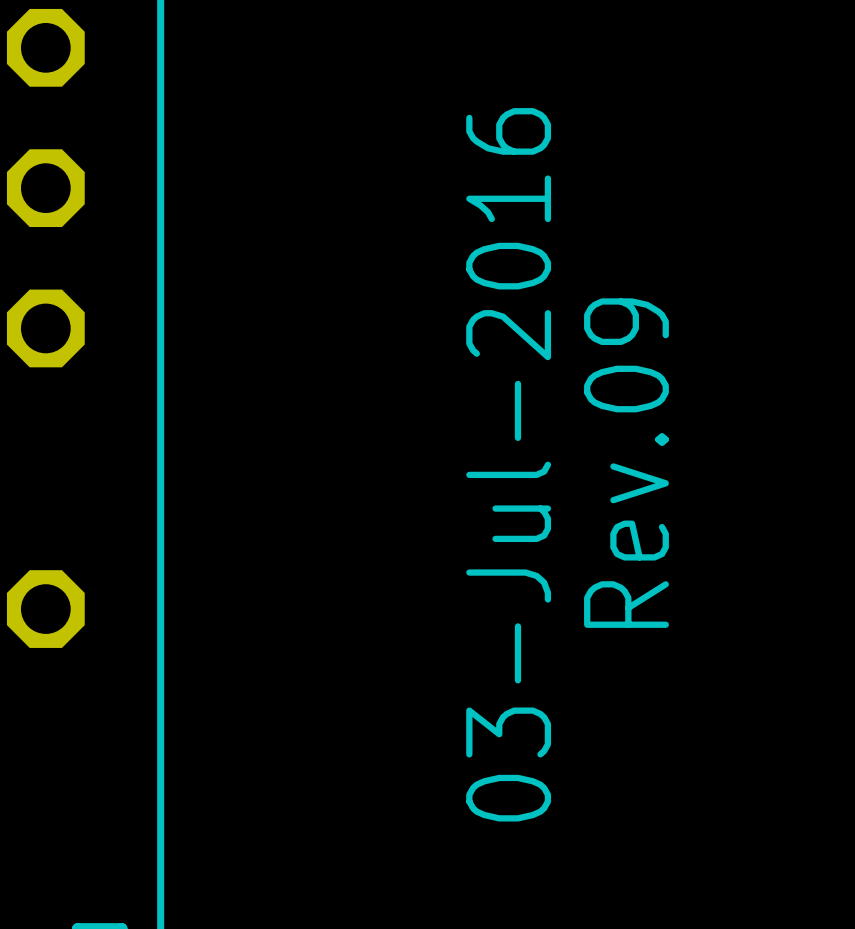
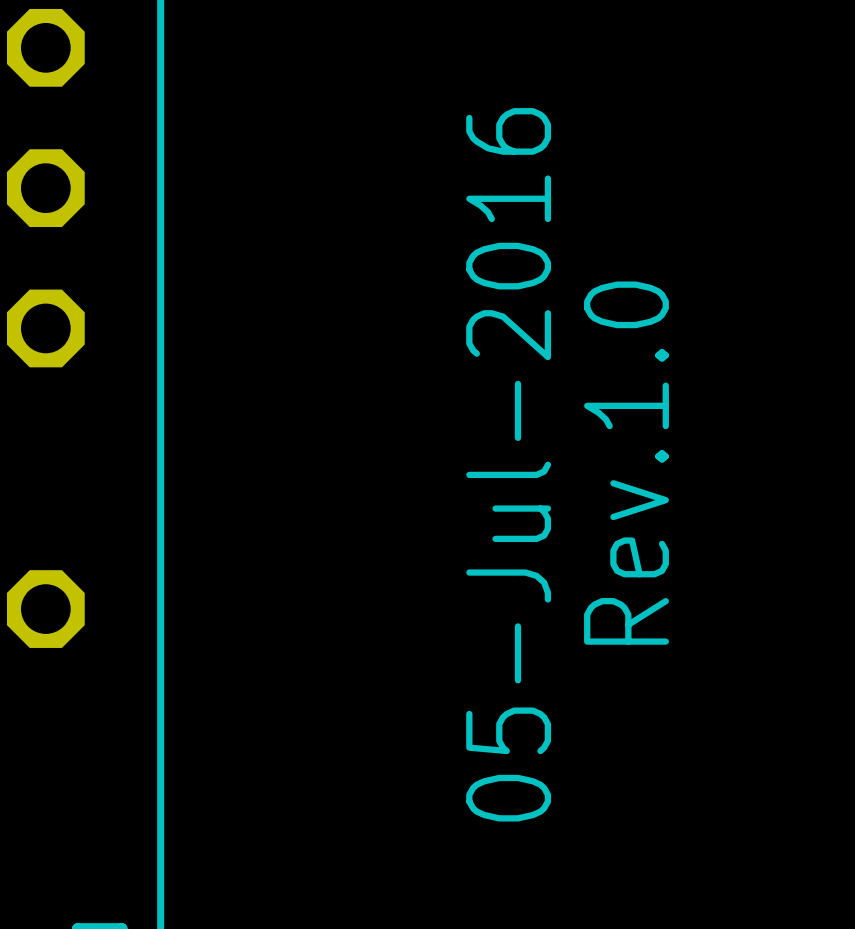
text: Rev.09 (626, 463) -> Rev.1.0 (626, 463)
text: 03-Jul-2016 (508, 464) -> 05-Jul-2016 (508, 464)

